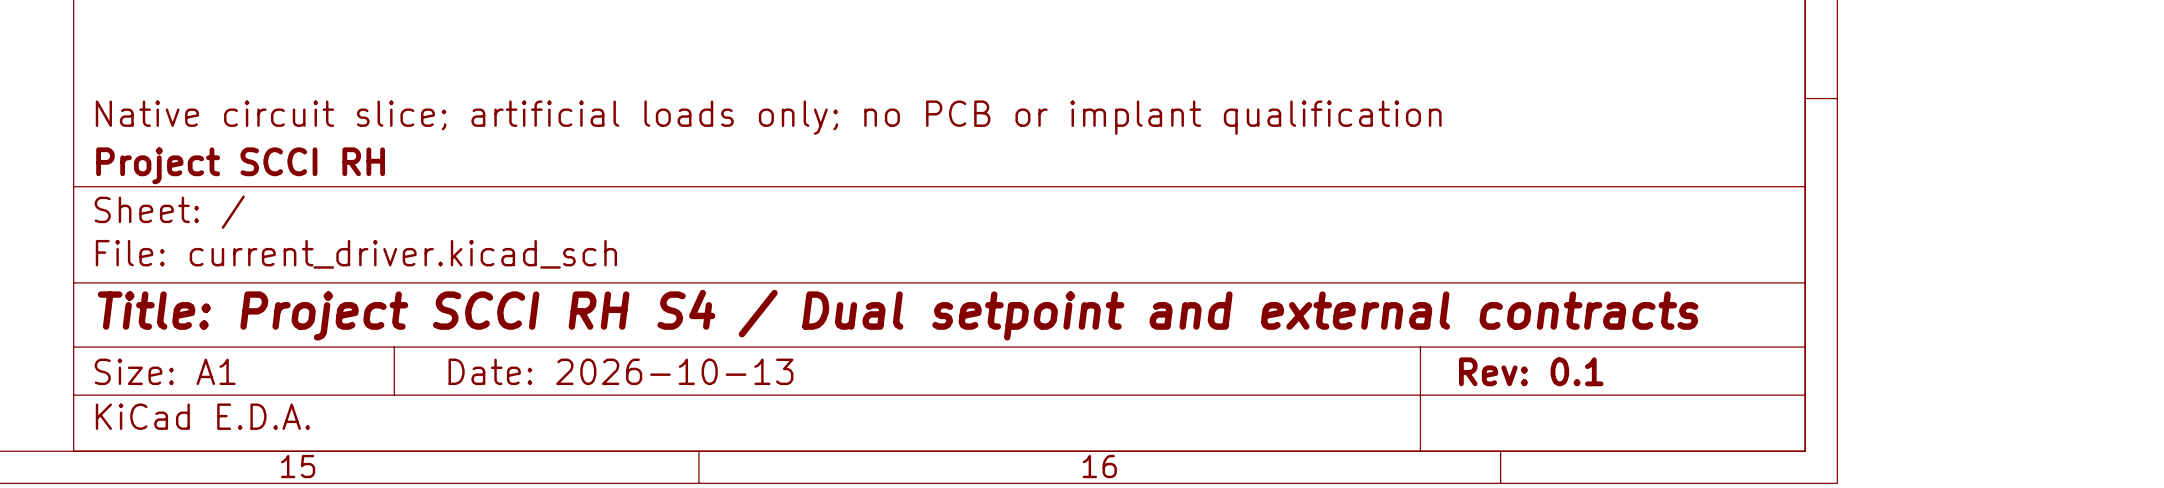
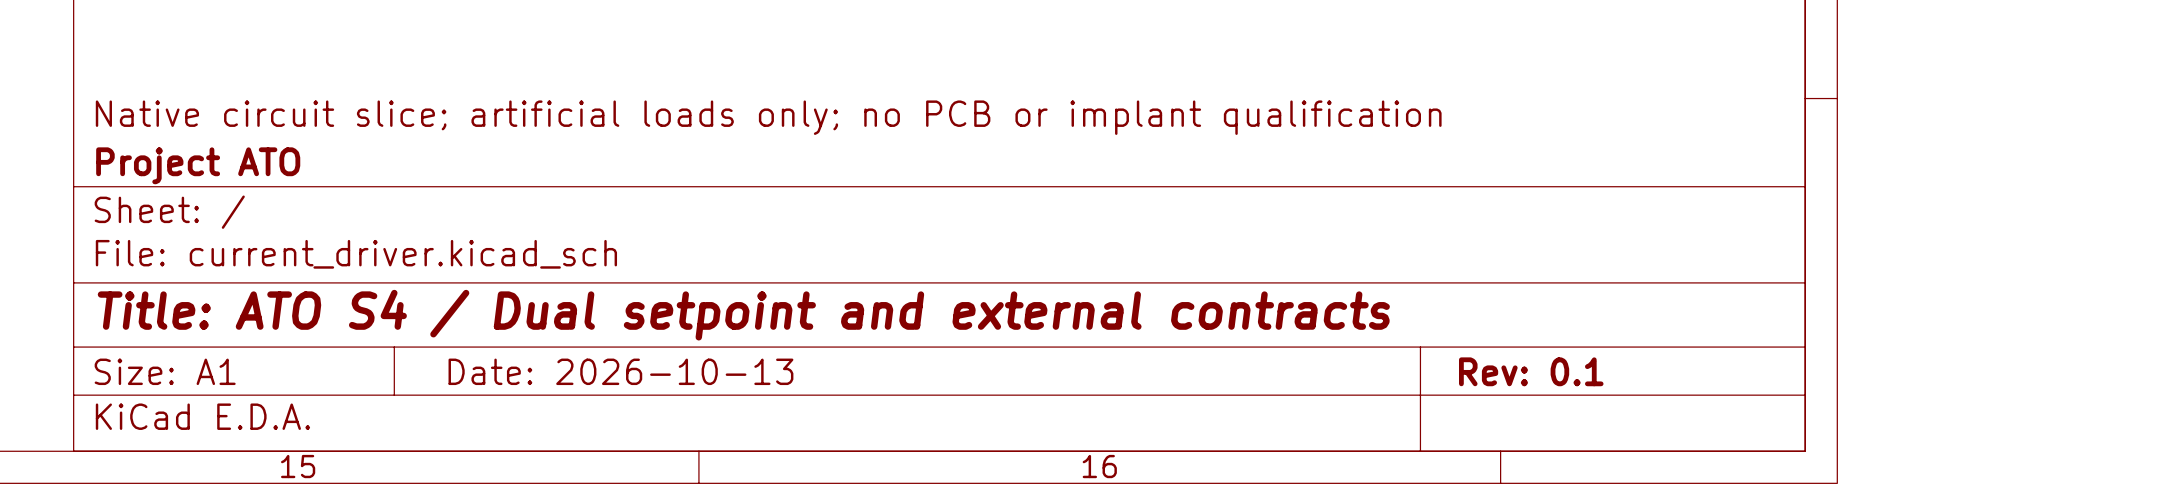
title block: Project SCCI RH (240, 165) -> Project ATO (198, 165)
title block: Title: Project SCCI RH S4 / Dual setpoint and external contracts (898, 315) -> Title: ATO S4 / Dual setpoint and external contracts (743, 315)

